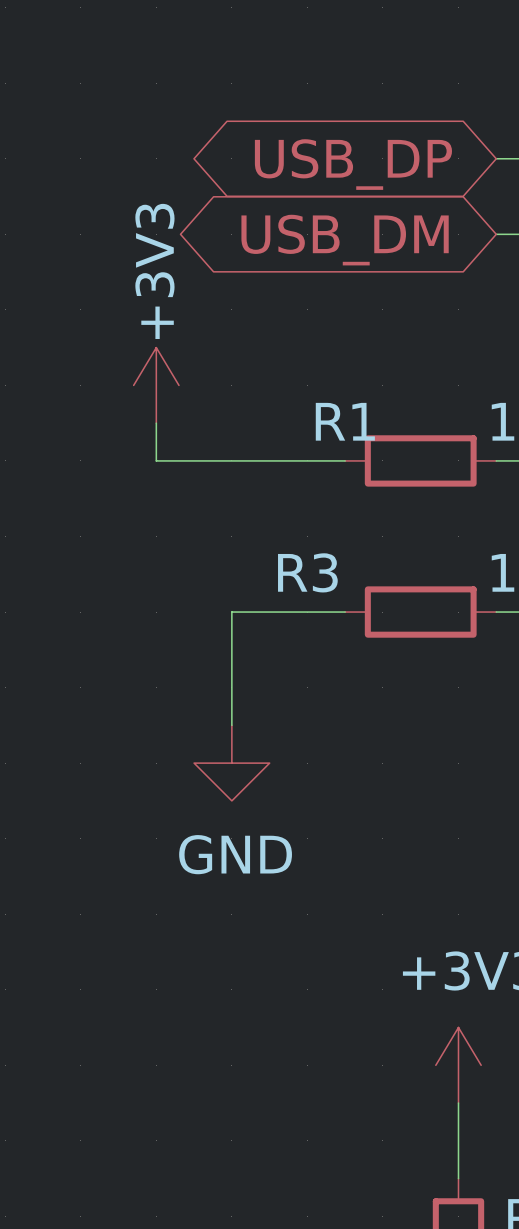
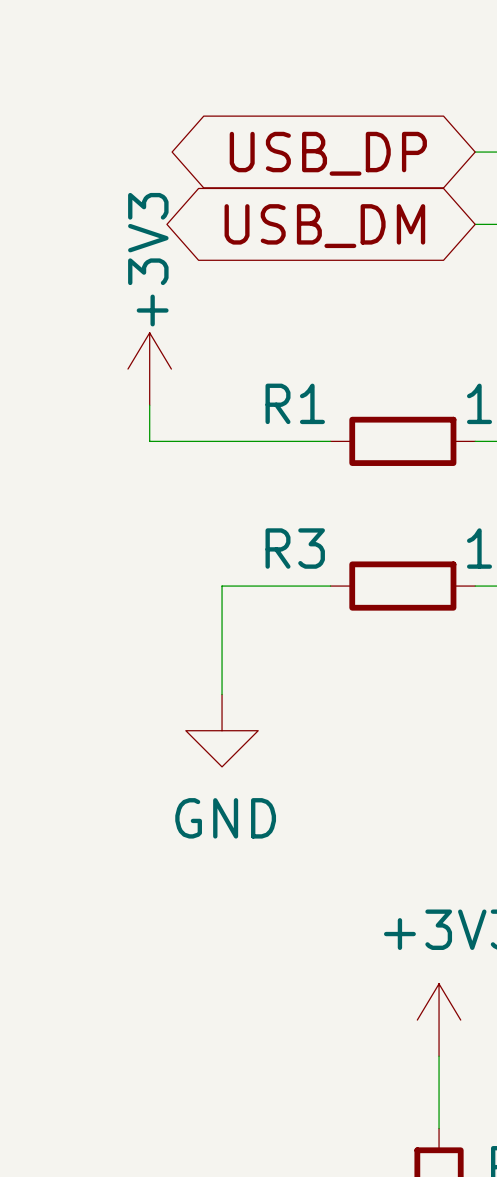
R1 name position: R1 (345, 421) -> R1 (295, 403)

